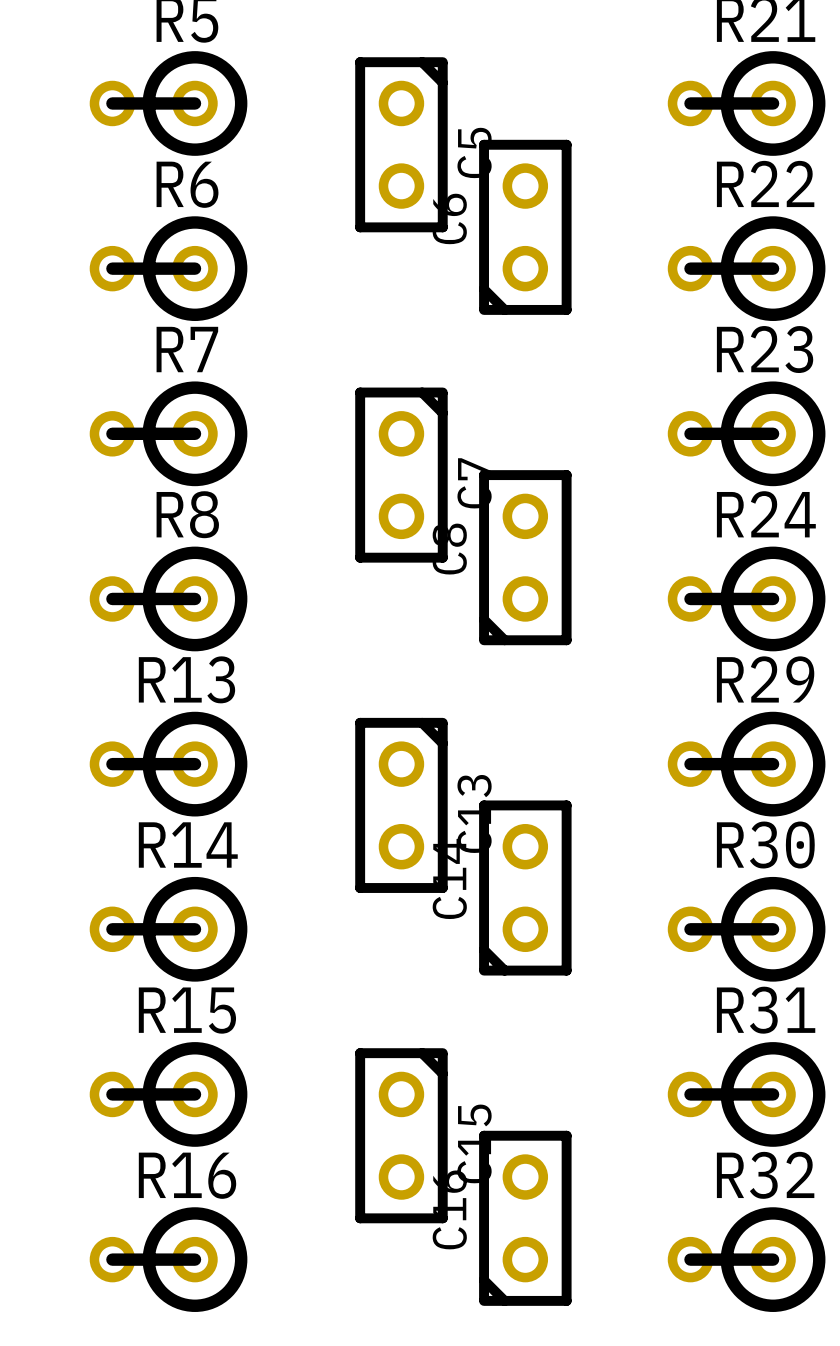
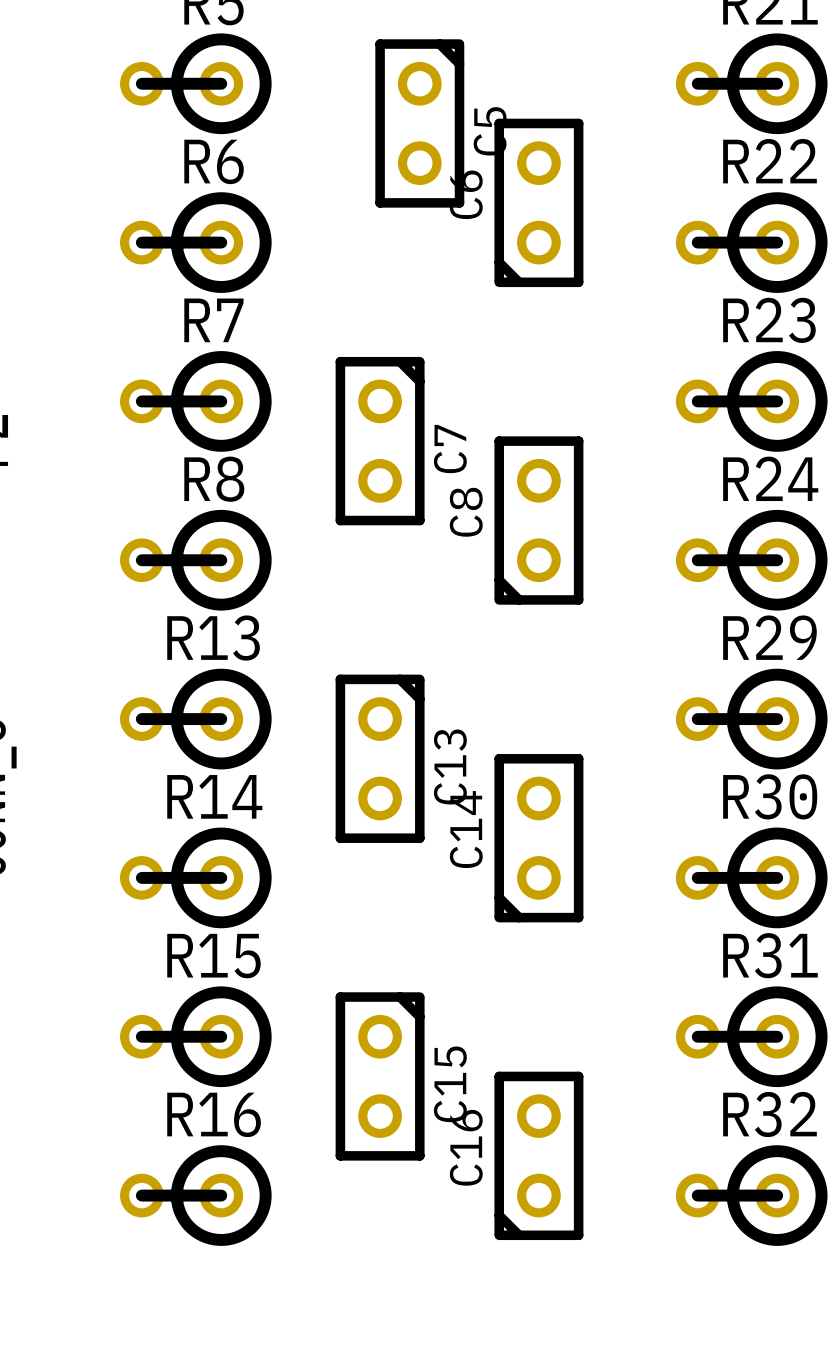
C7 position: (401, 475) -> (380, 441)
C13 position: (401, 805) -> (380, 758)
C15 position: (401, 1135) -> (380, 1076)

